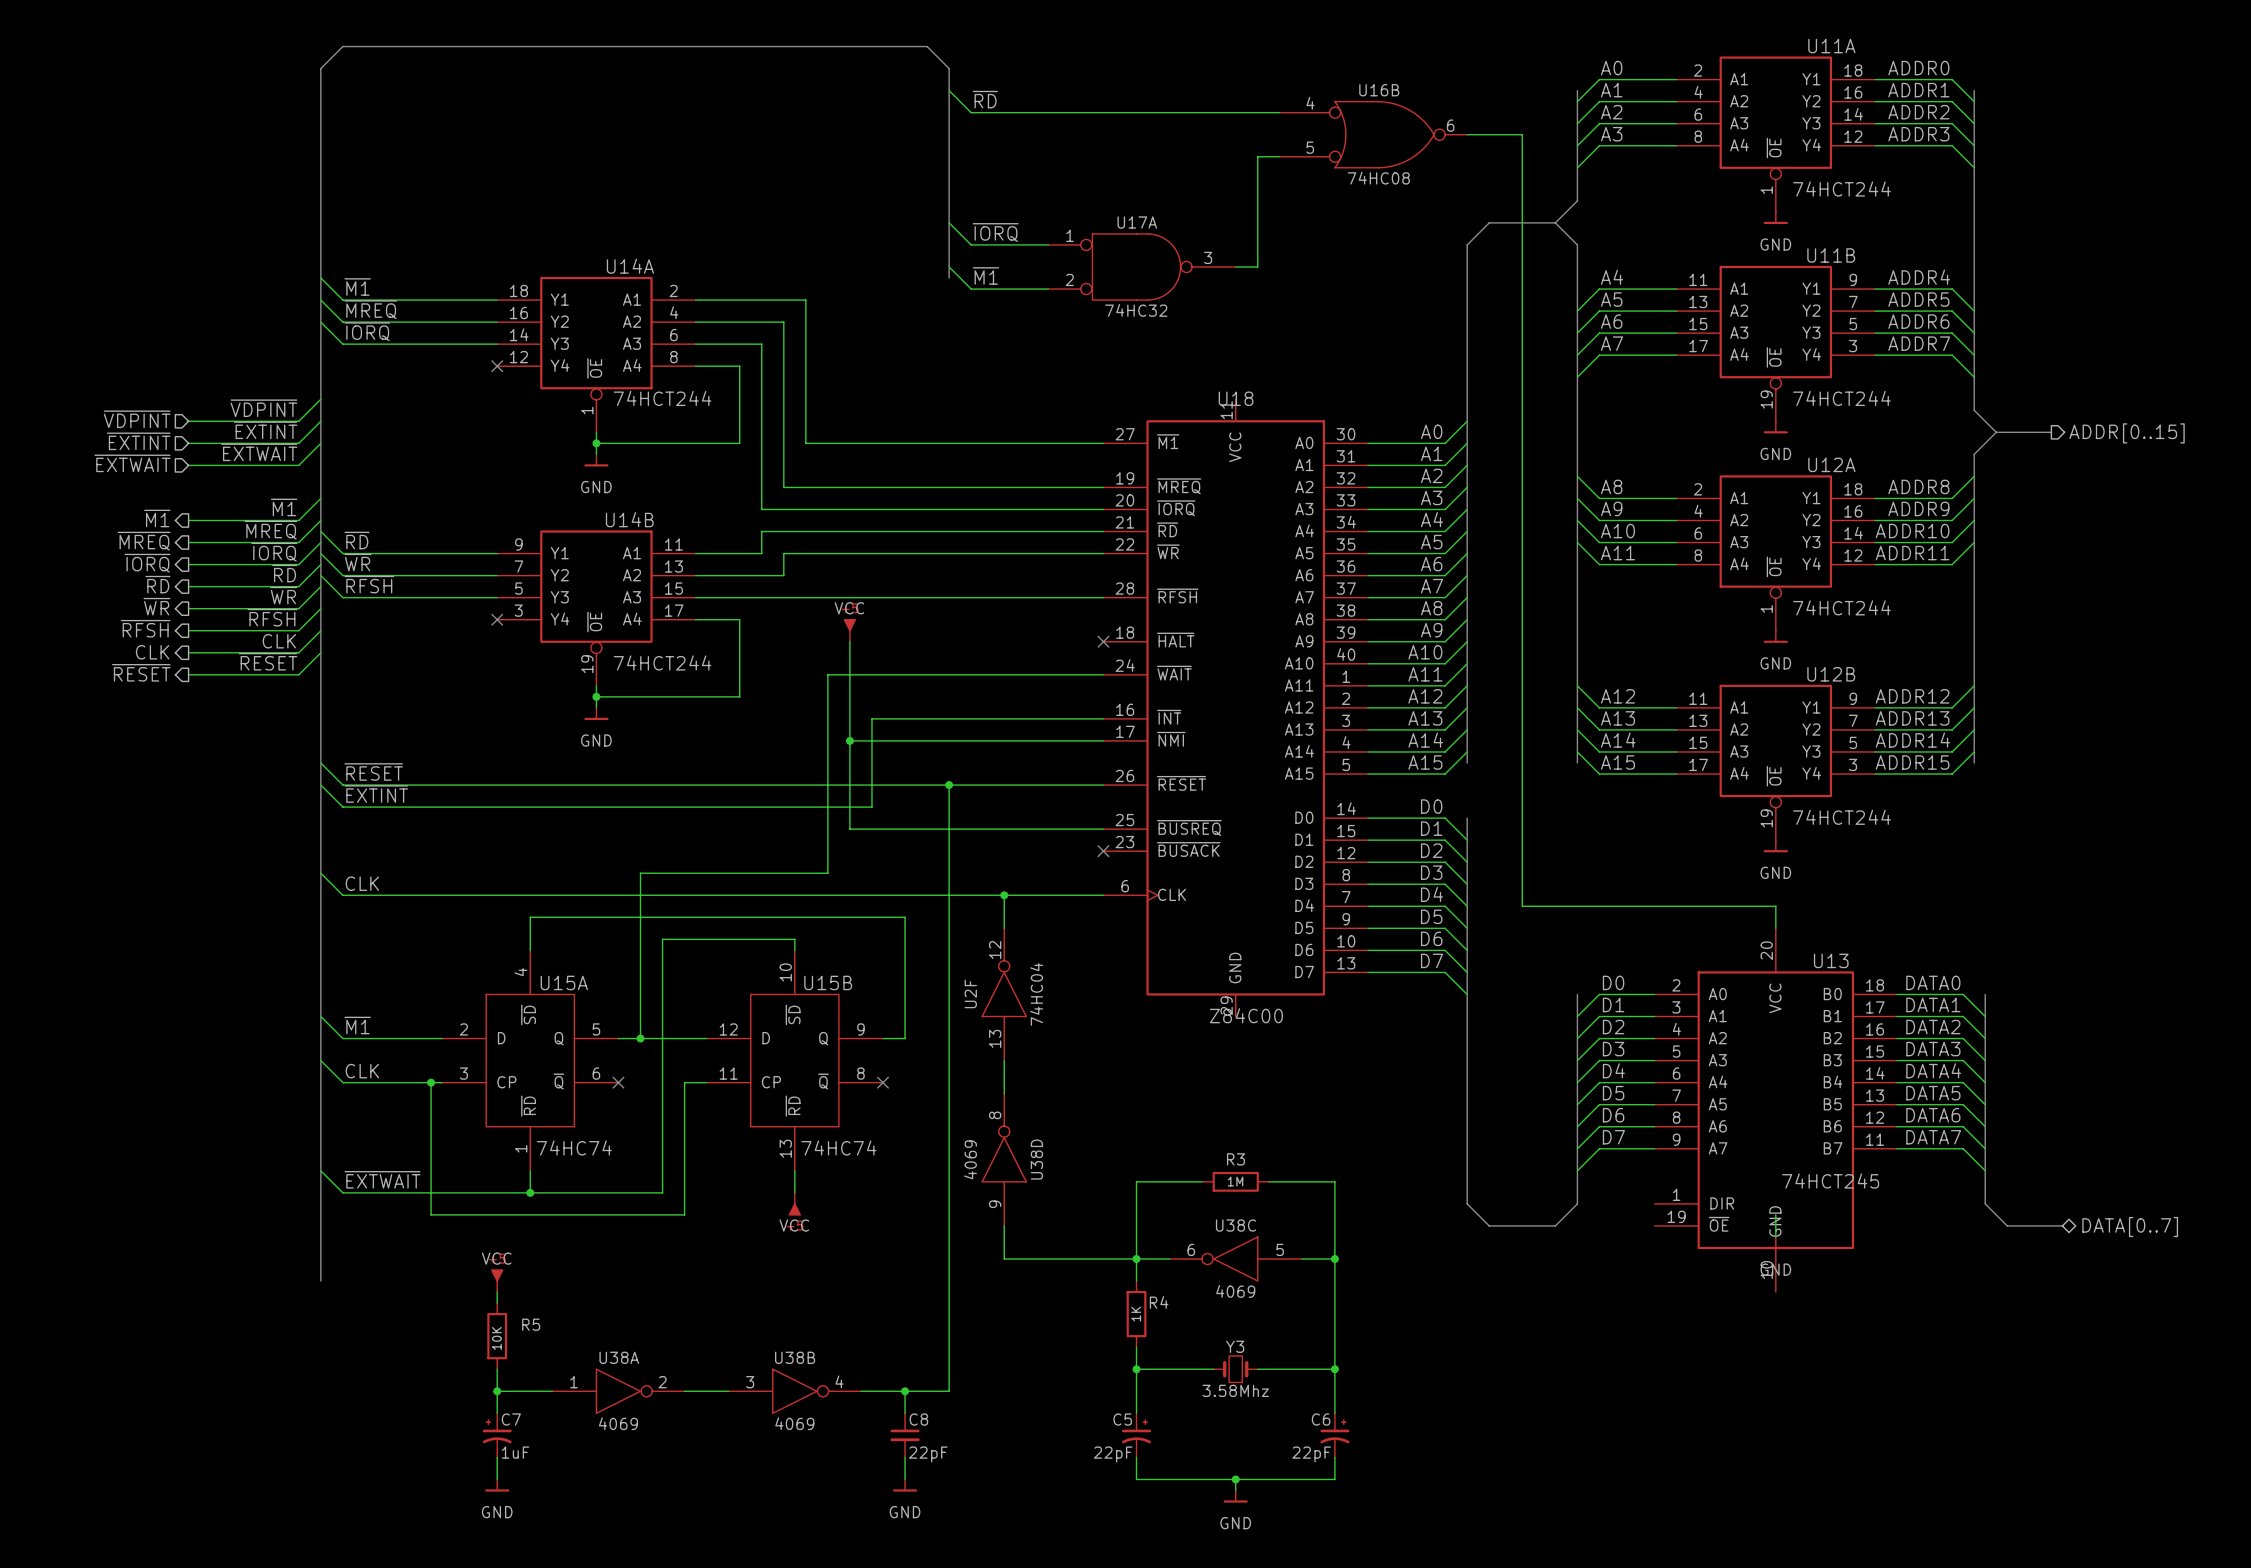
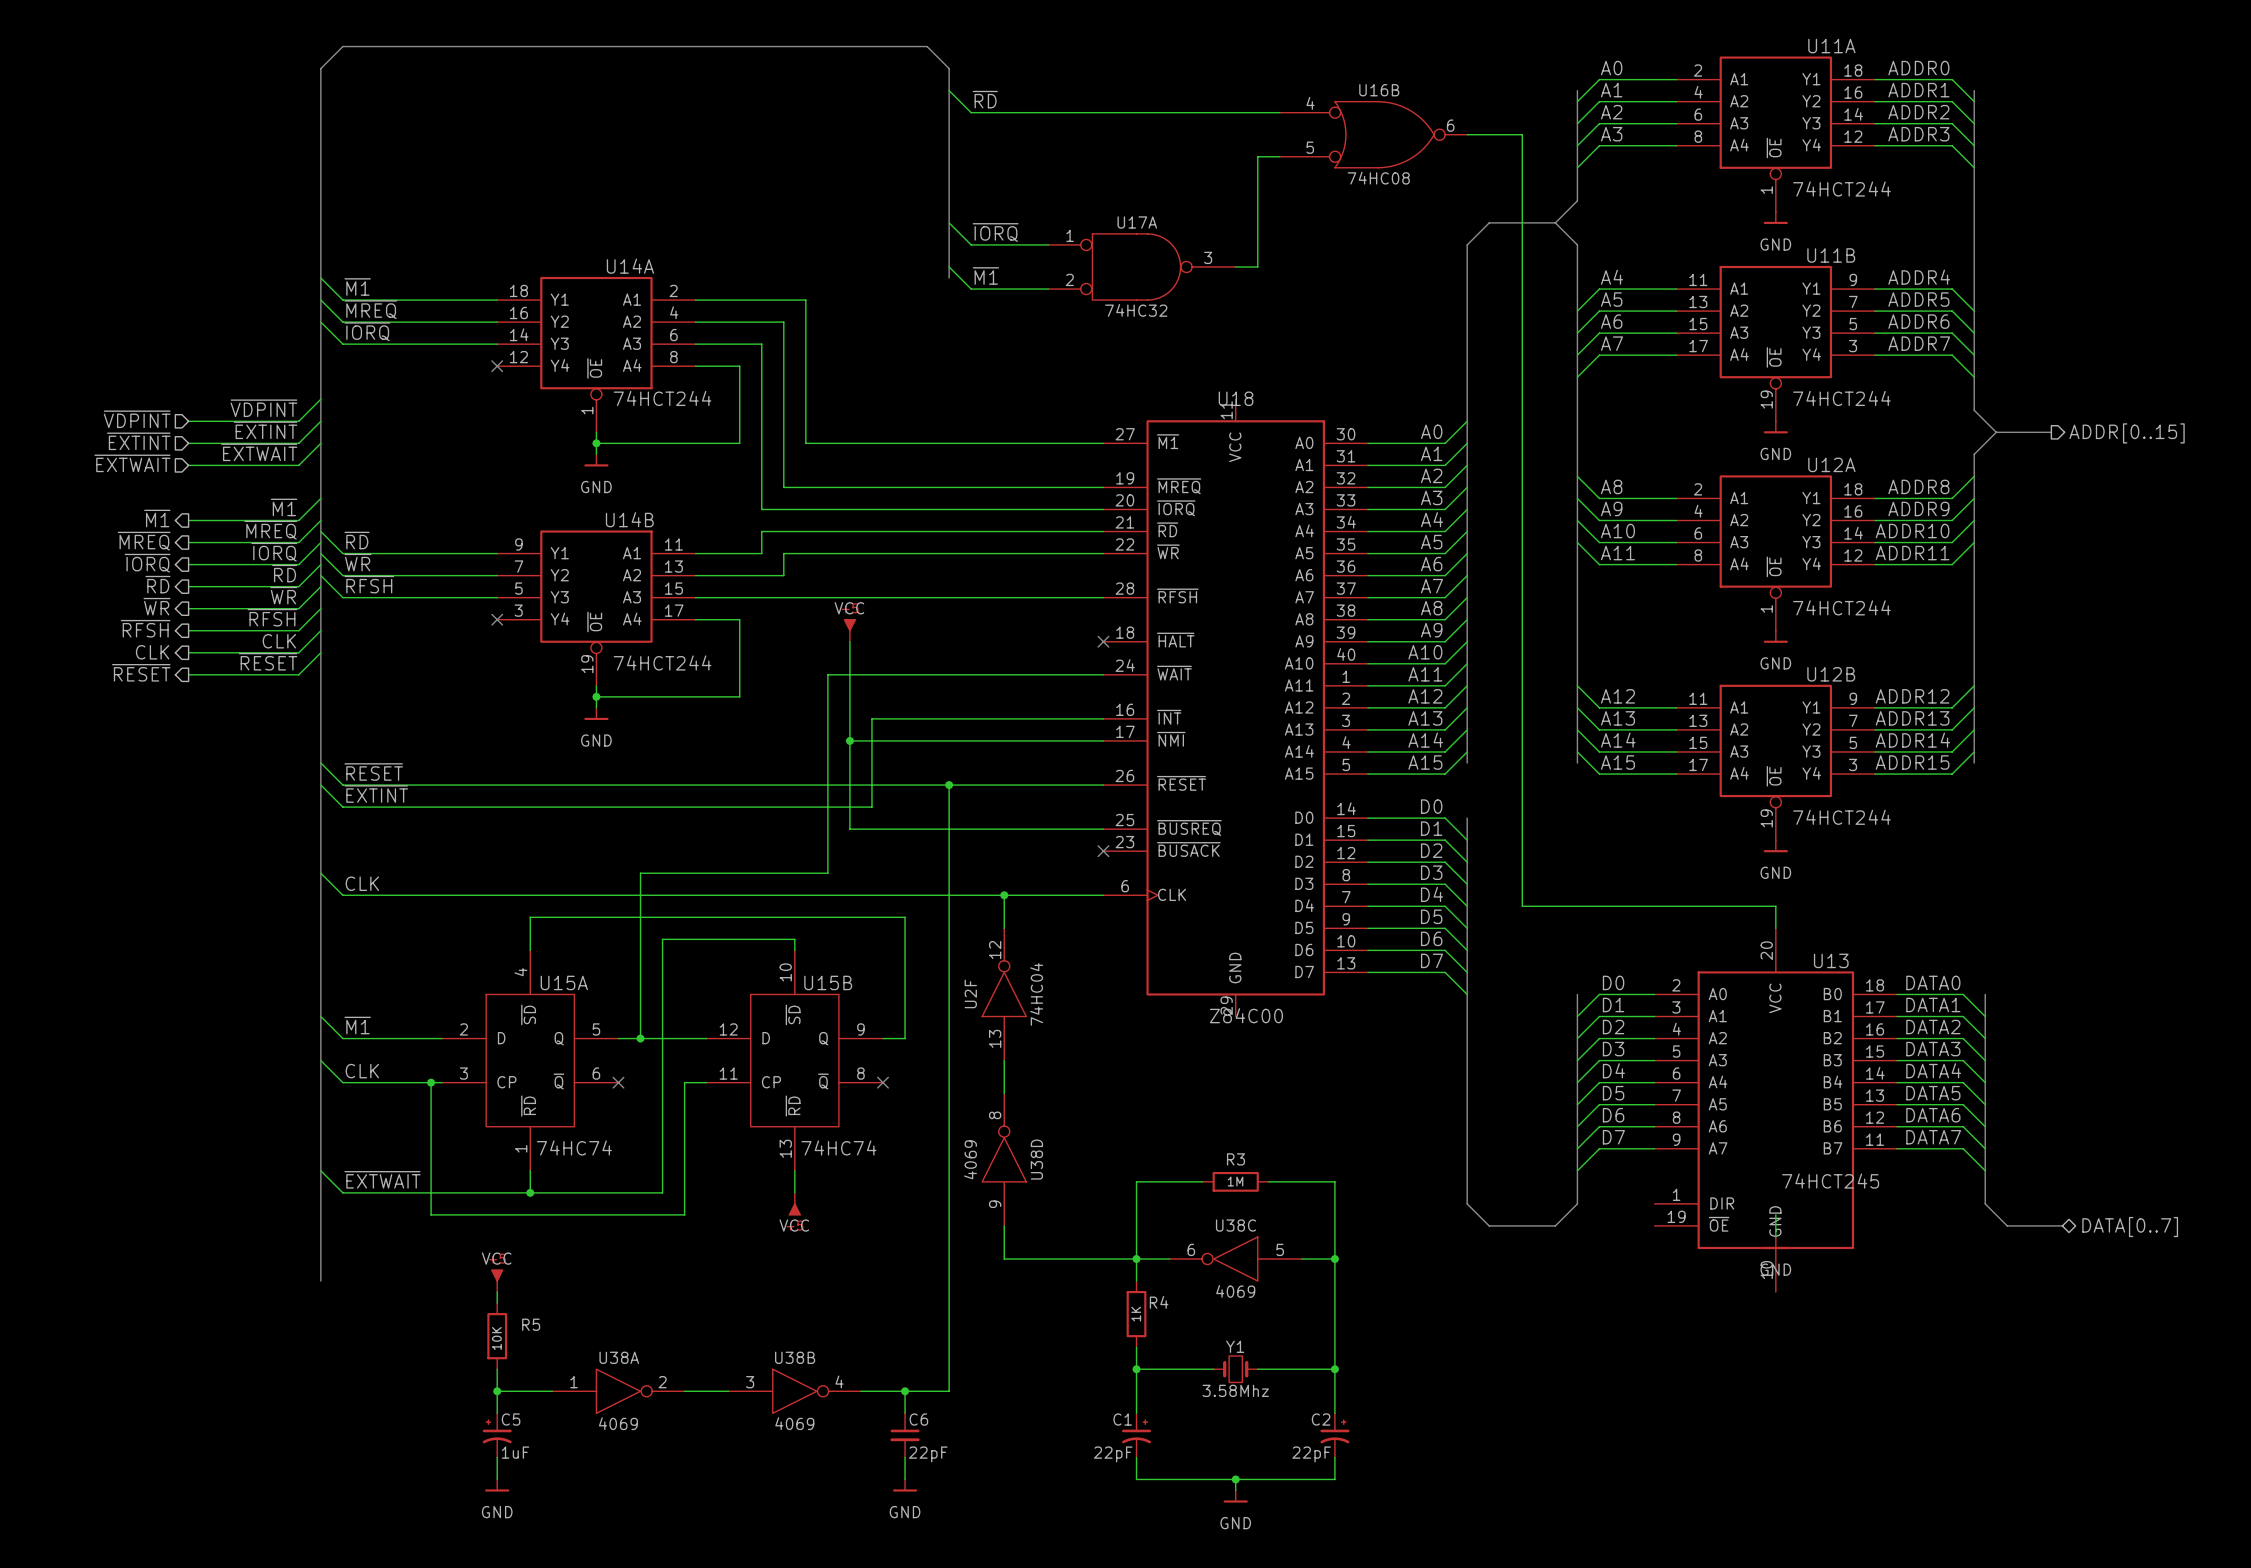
Y3 name: Y3 (1235, 1346) -> Y1 (1235, 1346)
C7 name: C7 (511, 1419) -> C5 (511, 1419)
C8 name: C8 (918, 1419) -> C6 (918, 1419)
C5 name: C5 (1122, 1419) -> C1 (1122, 1419)
C6 name: C6 (1321, 1419) -> C2 (1321, 1419)

